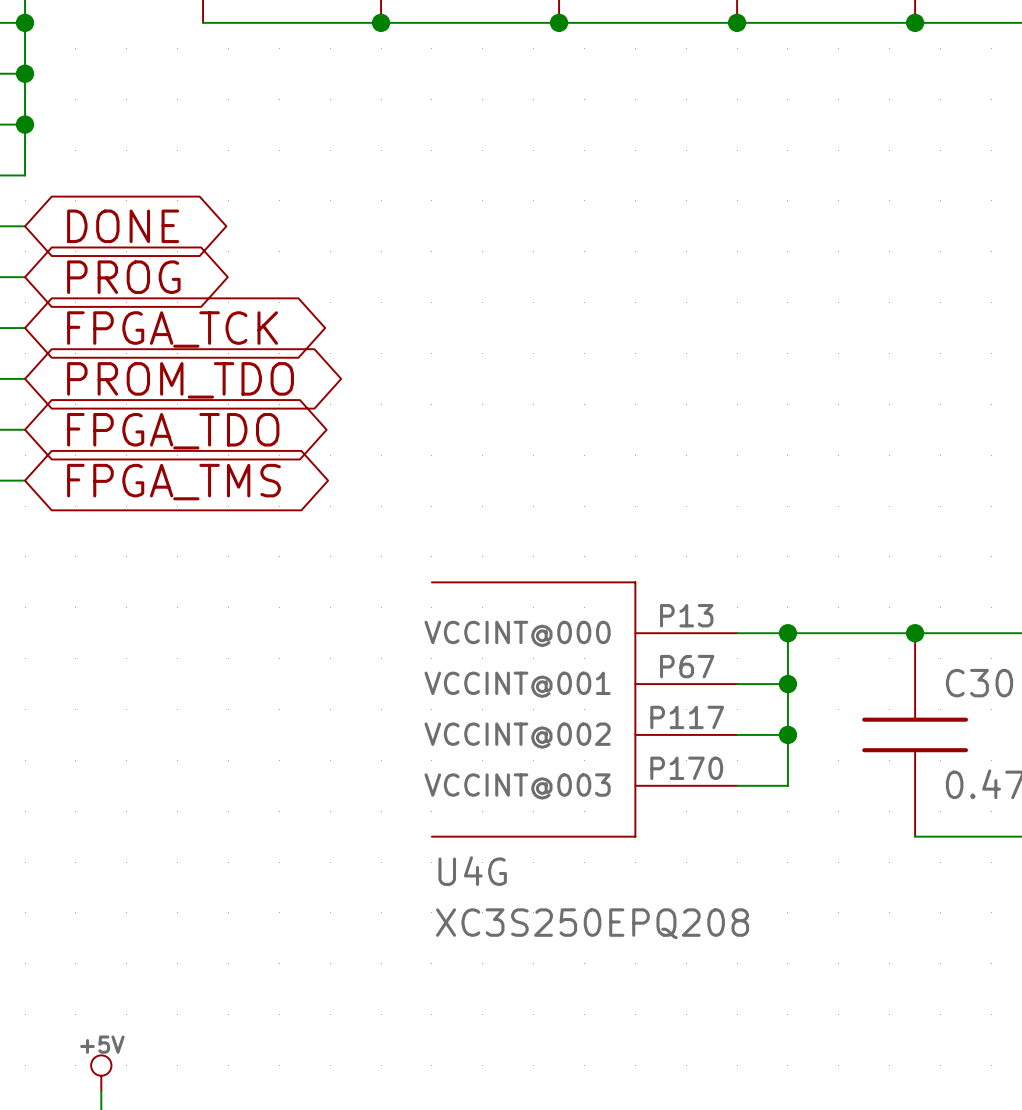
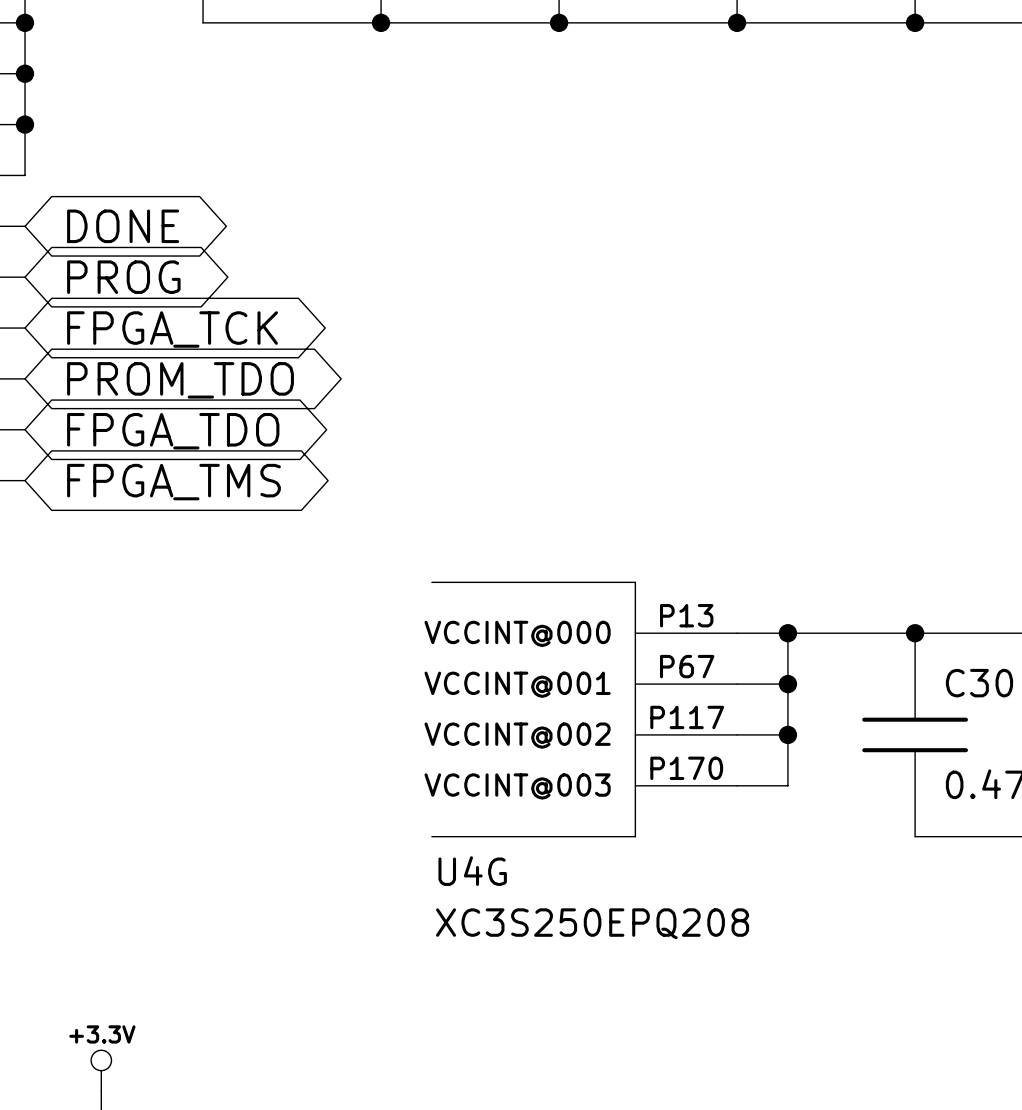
power symbol: +5V (101, 1073) -> +3.3V (101, 1070)

